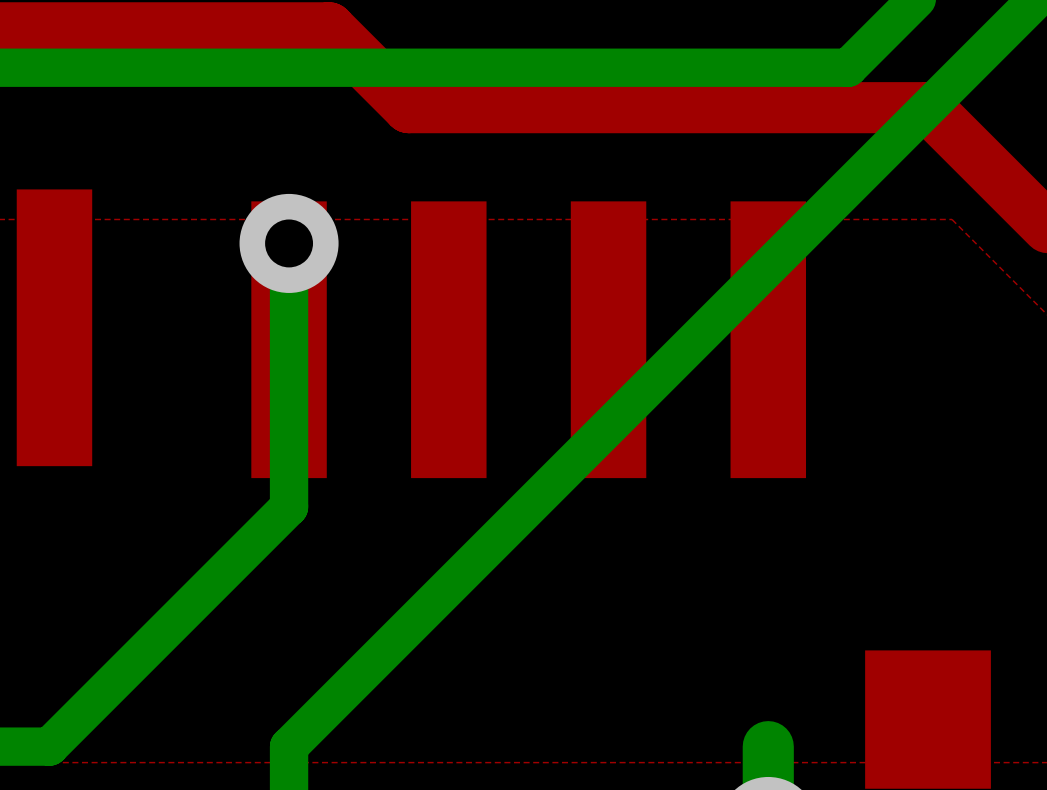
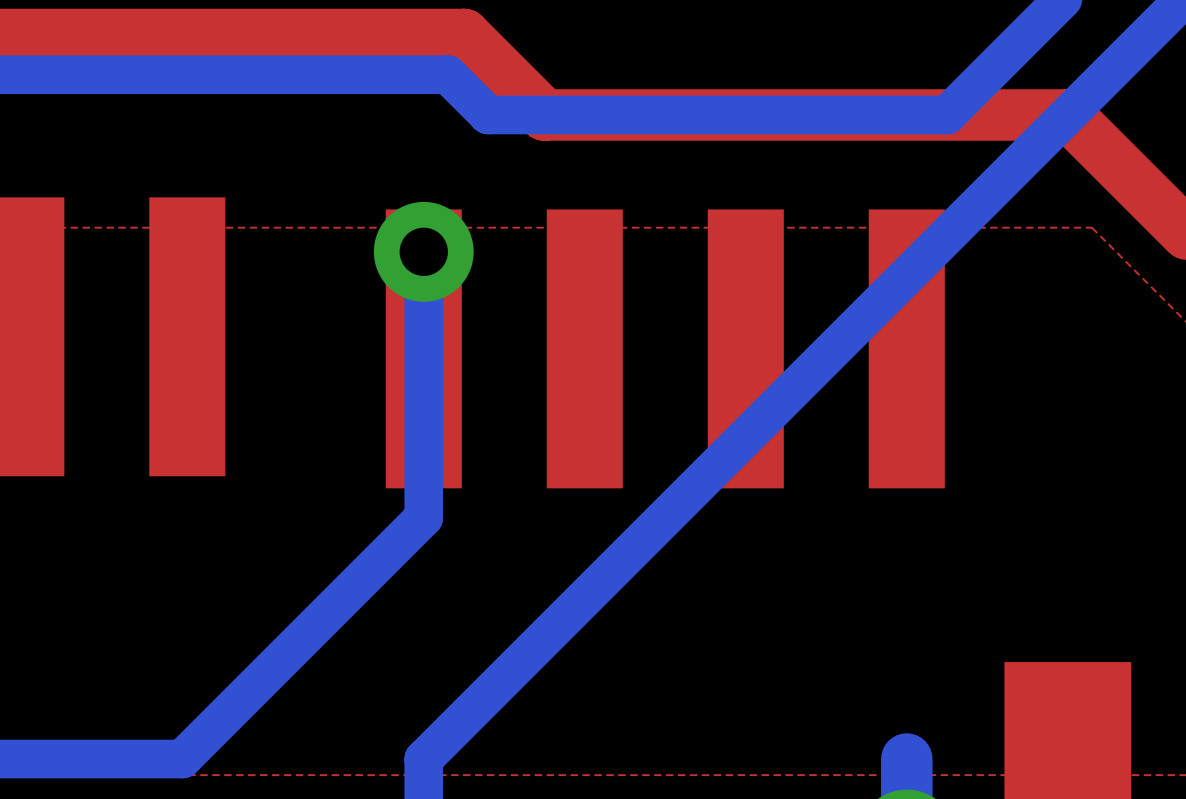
bottom track: (848, 67) (313, 67) -> (987, 74) (947, 114) (488, 114) (447, 74)

